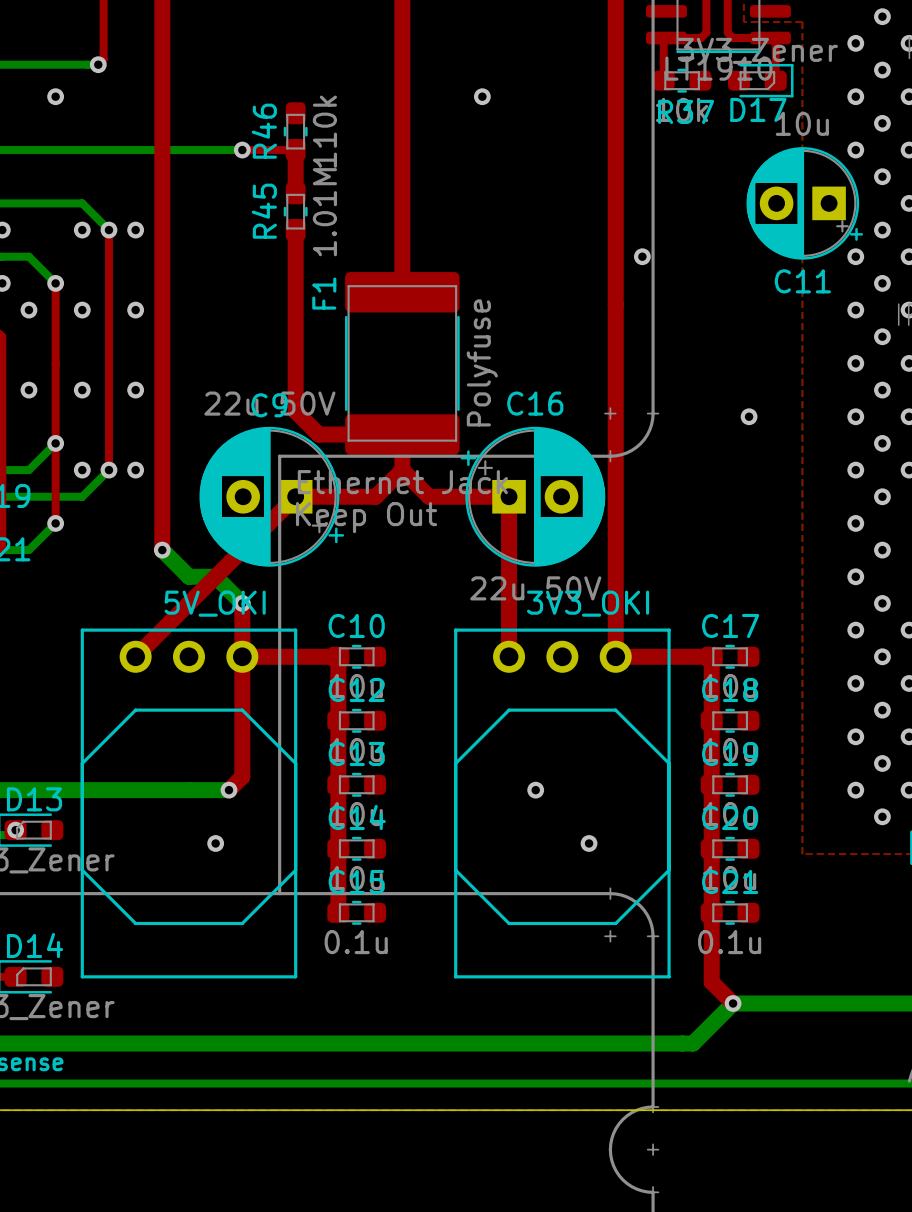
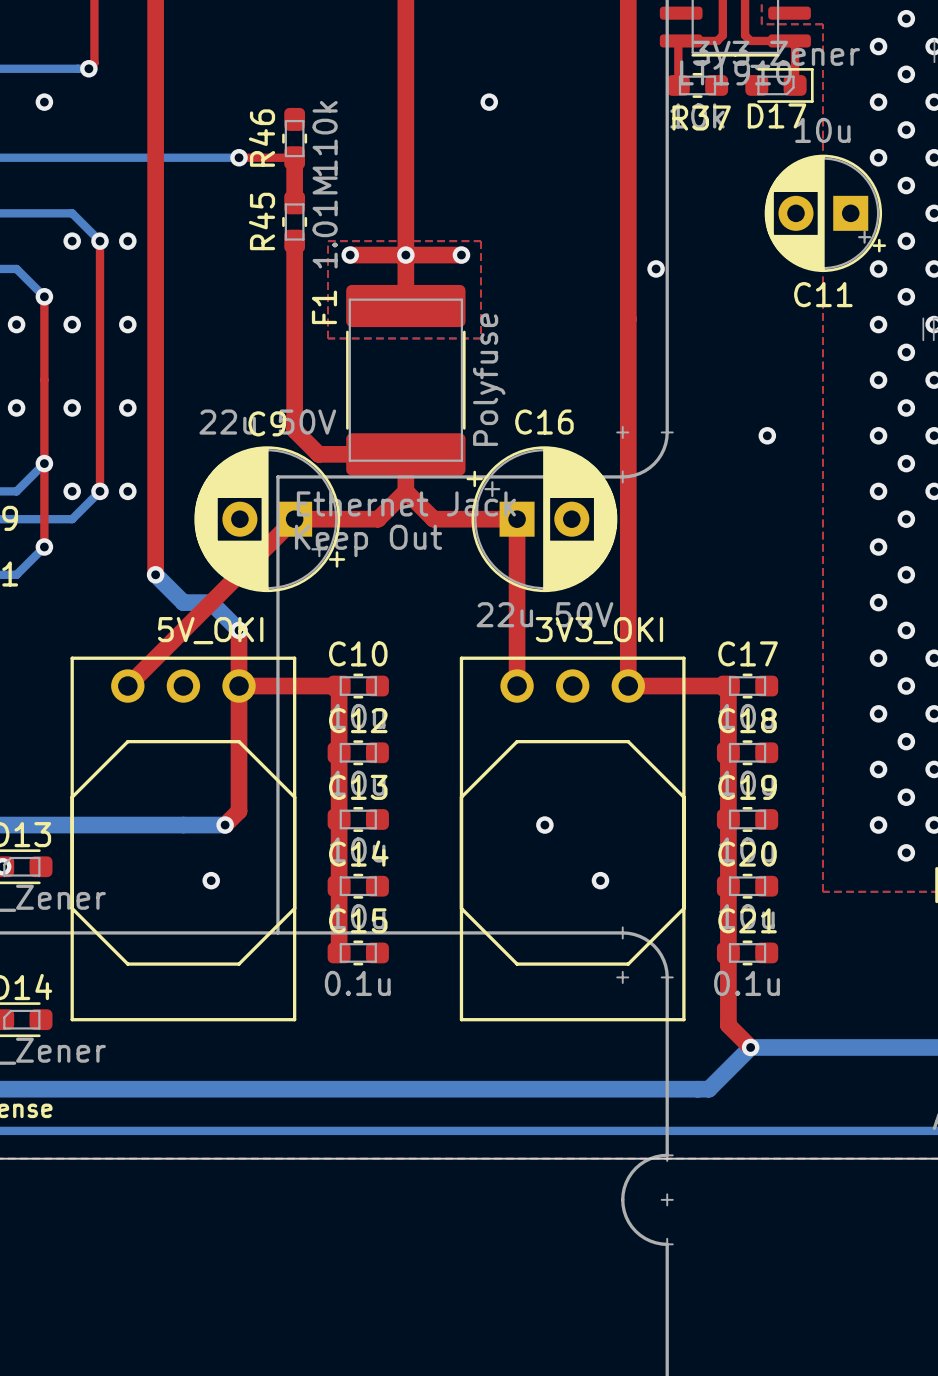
top zone outline: none -> (328, 241) (328, 338) (480, 338) (480, 241) (328, 241)
top track: none -> (350, 255) (461, 255)
via: none -> (350, 255)
via: none -> (405, 255)
via: none -> (461, 255)

